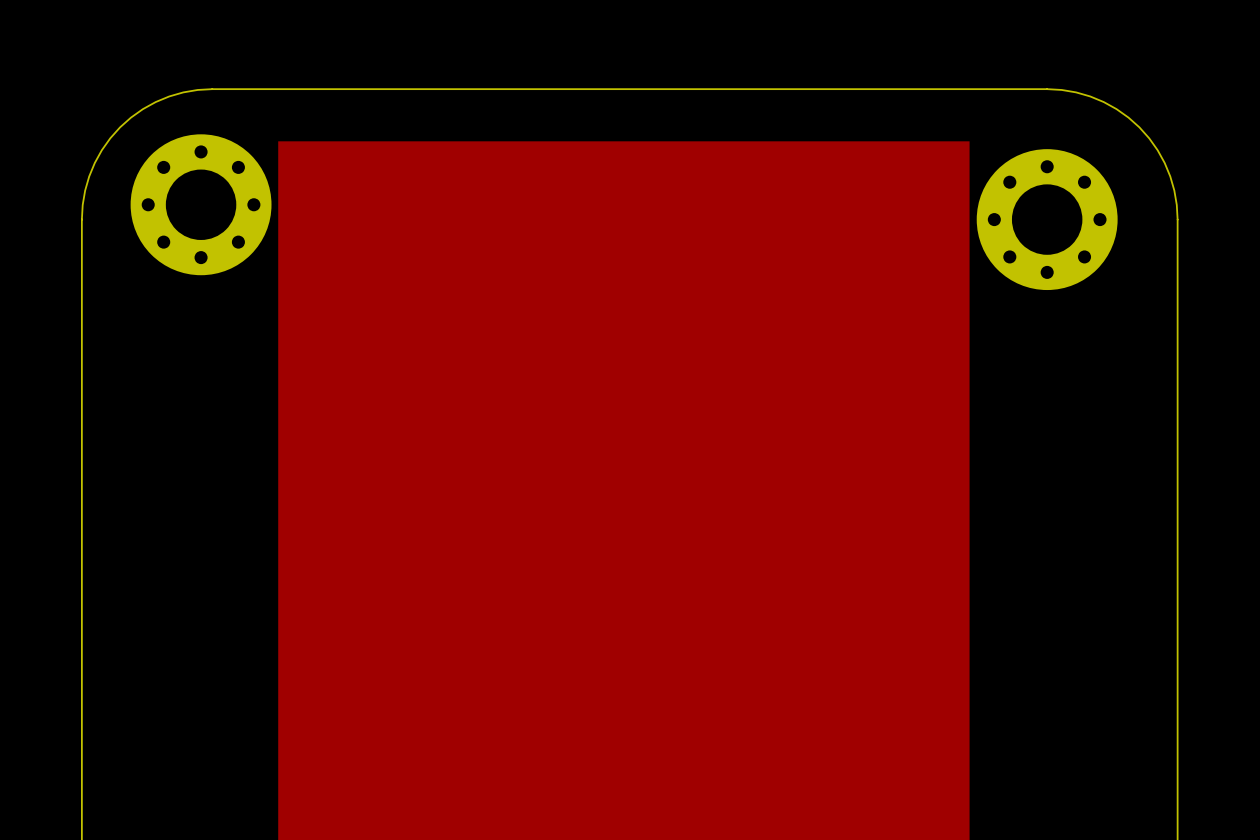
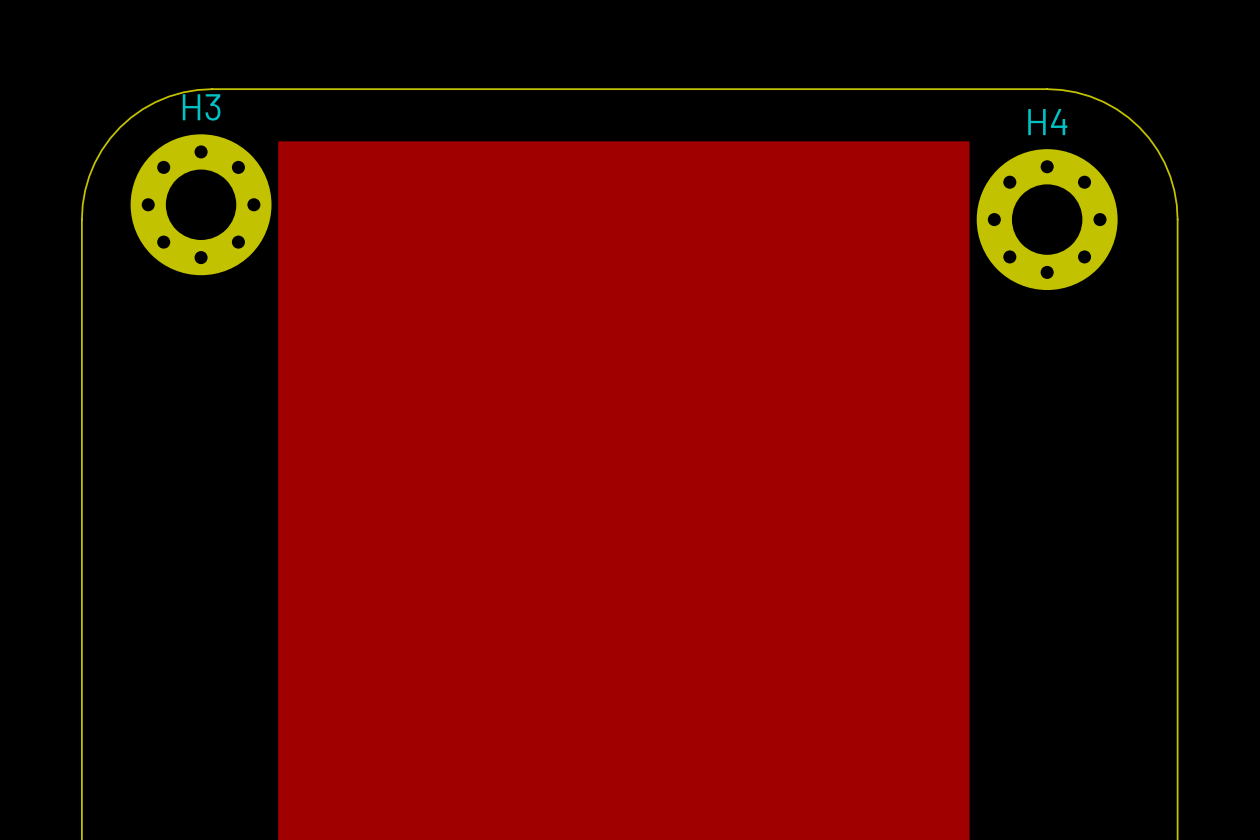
H3 name: none -> H3 (201, 107)
H4 name: none -> H4 (1047, 122)

